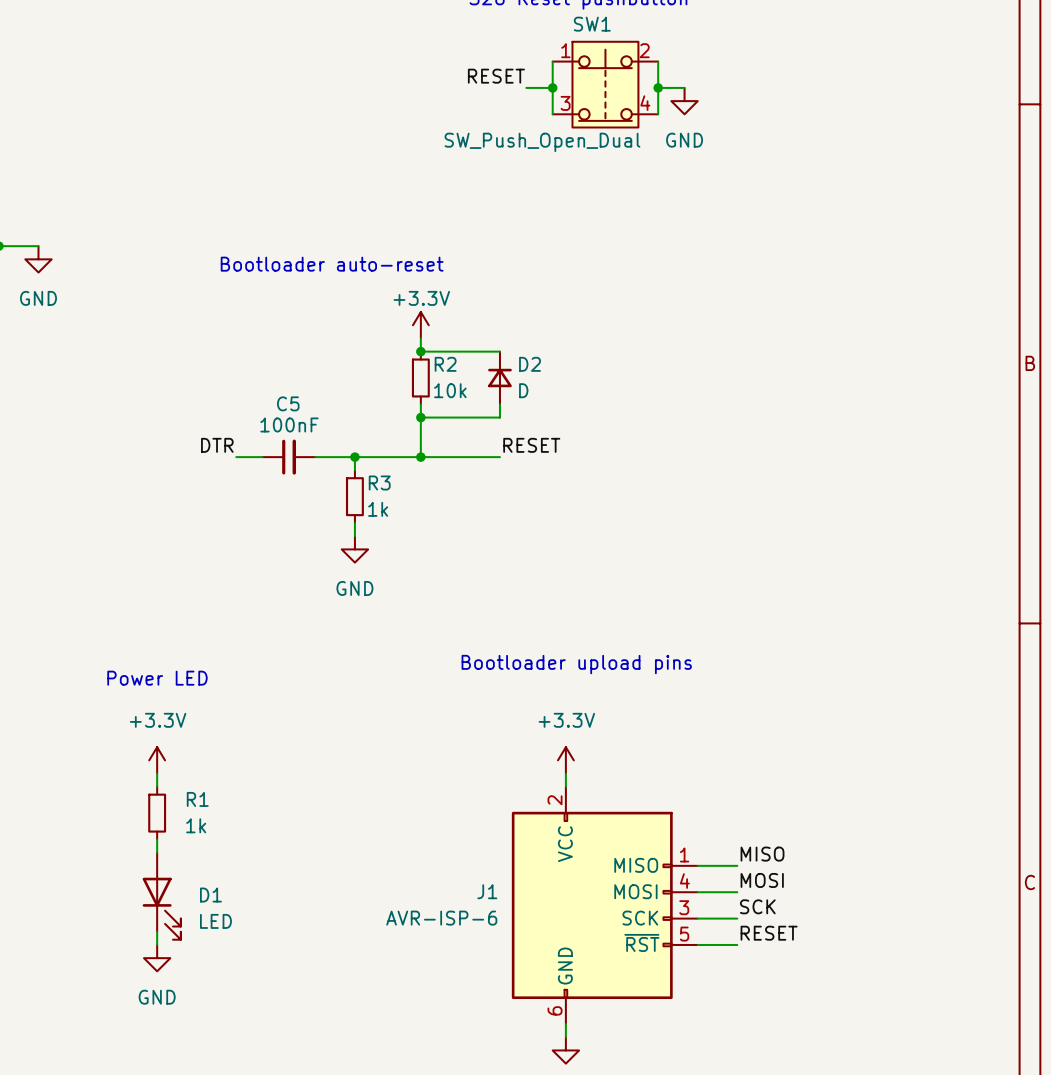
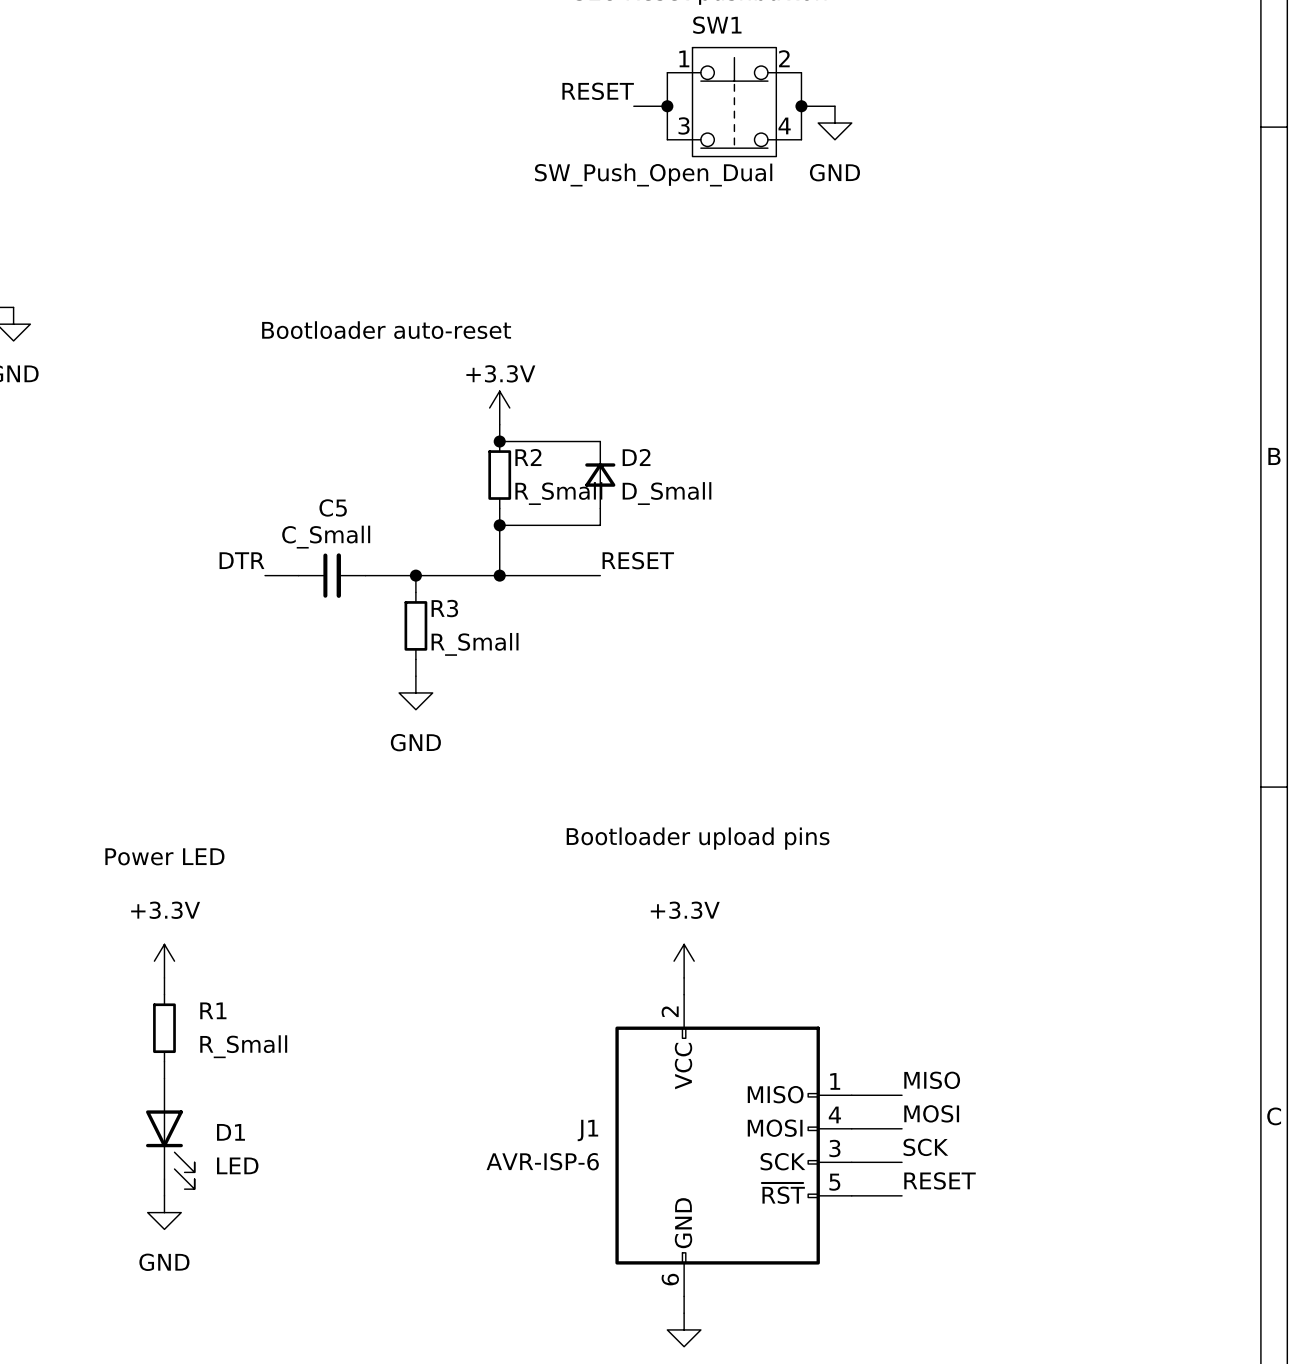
R2 value: 10k (450, 390) -> R_Small (558, 493)
D2 value: D (523, 390) -> D_Small (667, 493)
C5 value: 100nF (289, 424) -> C_Small (326, 537)
R3 value: 1k (378, 509) -> R_Small (475, 644)
R1 value: 1k (196, 825) -> R_Small (243, 1046)

